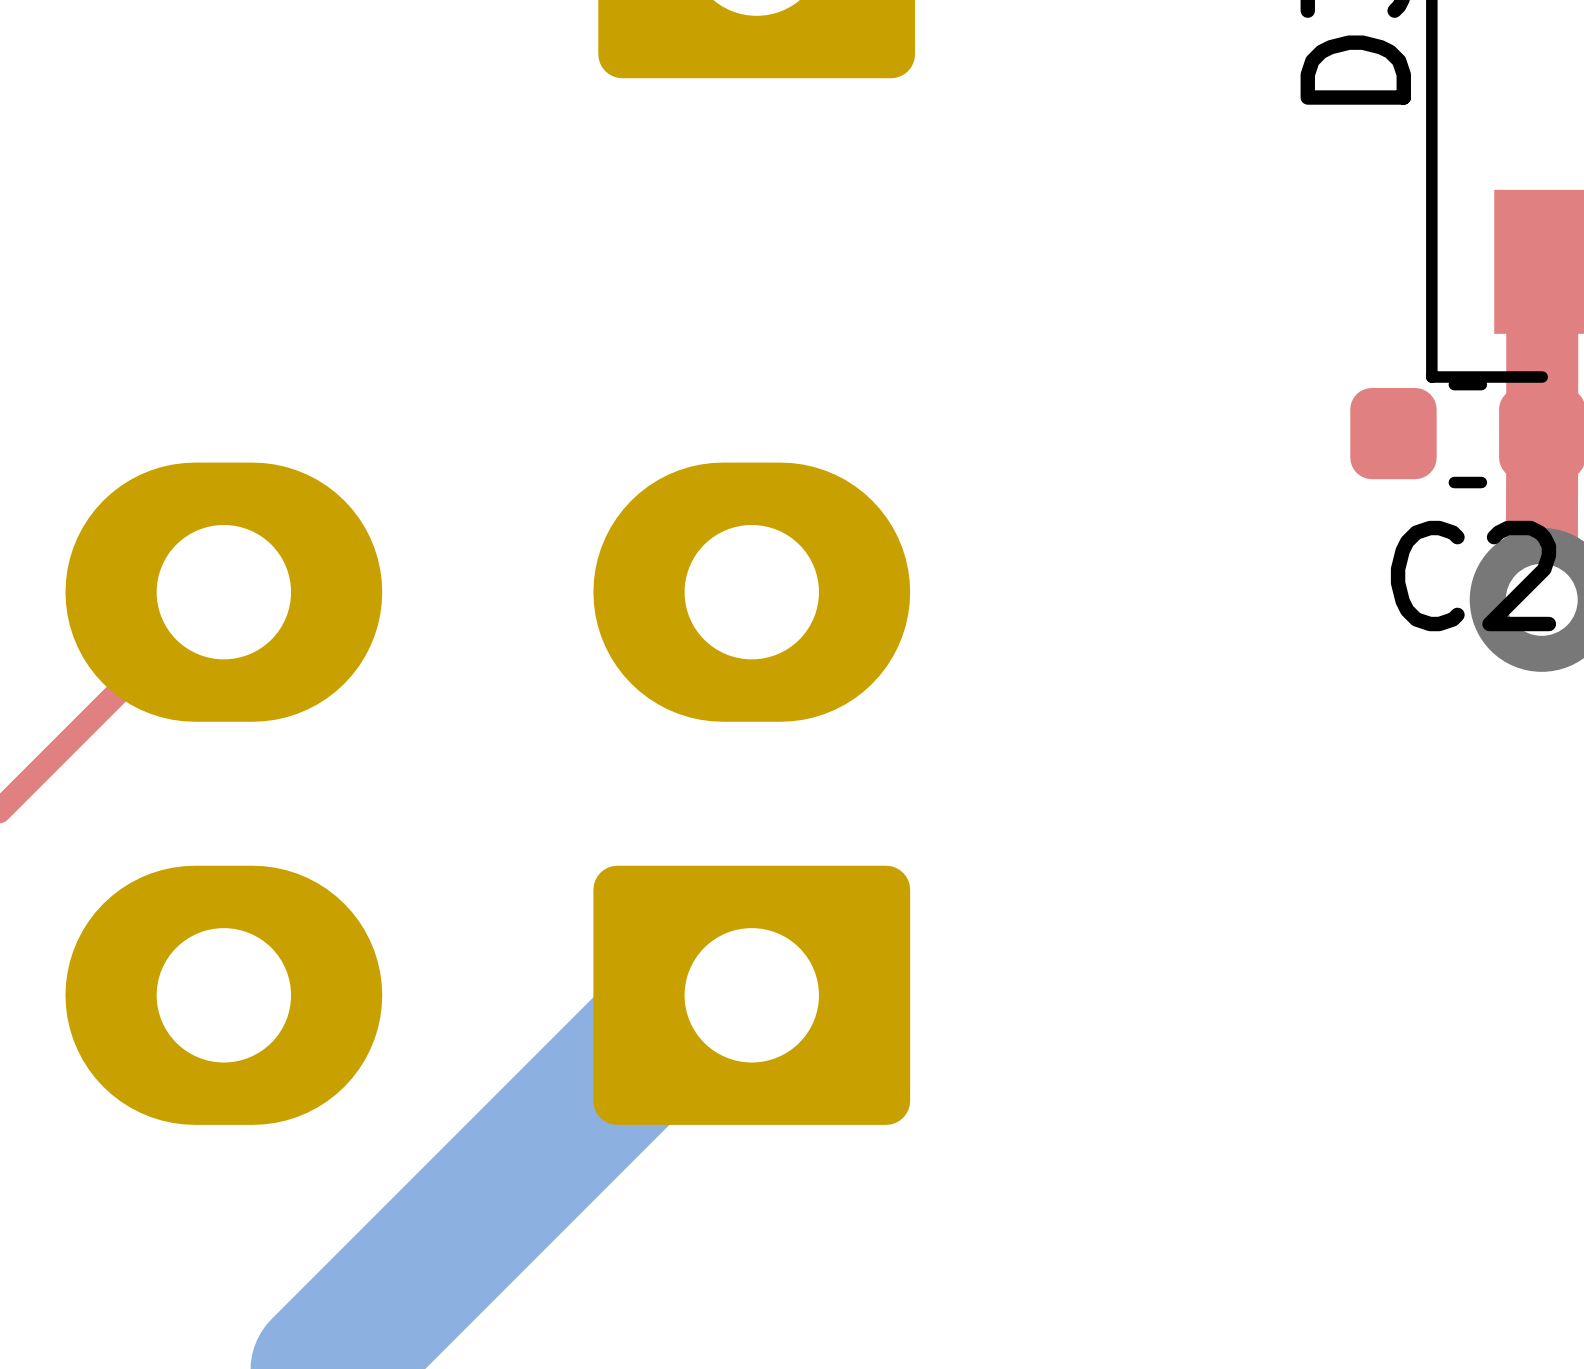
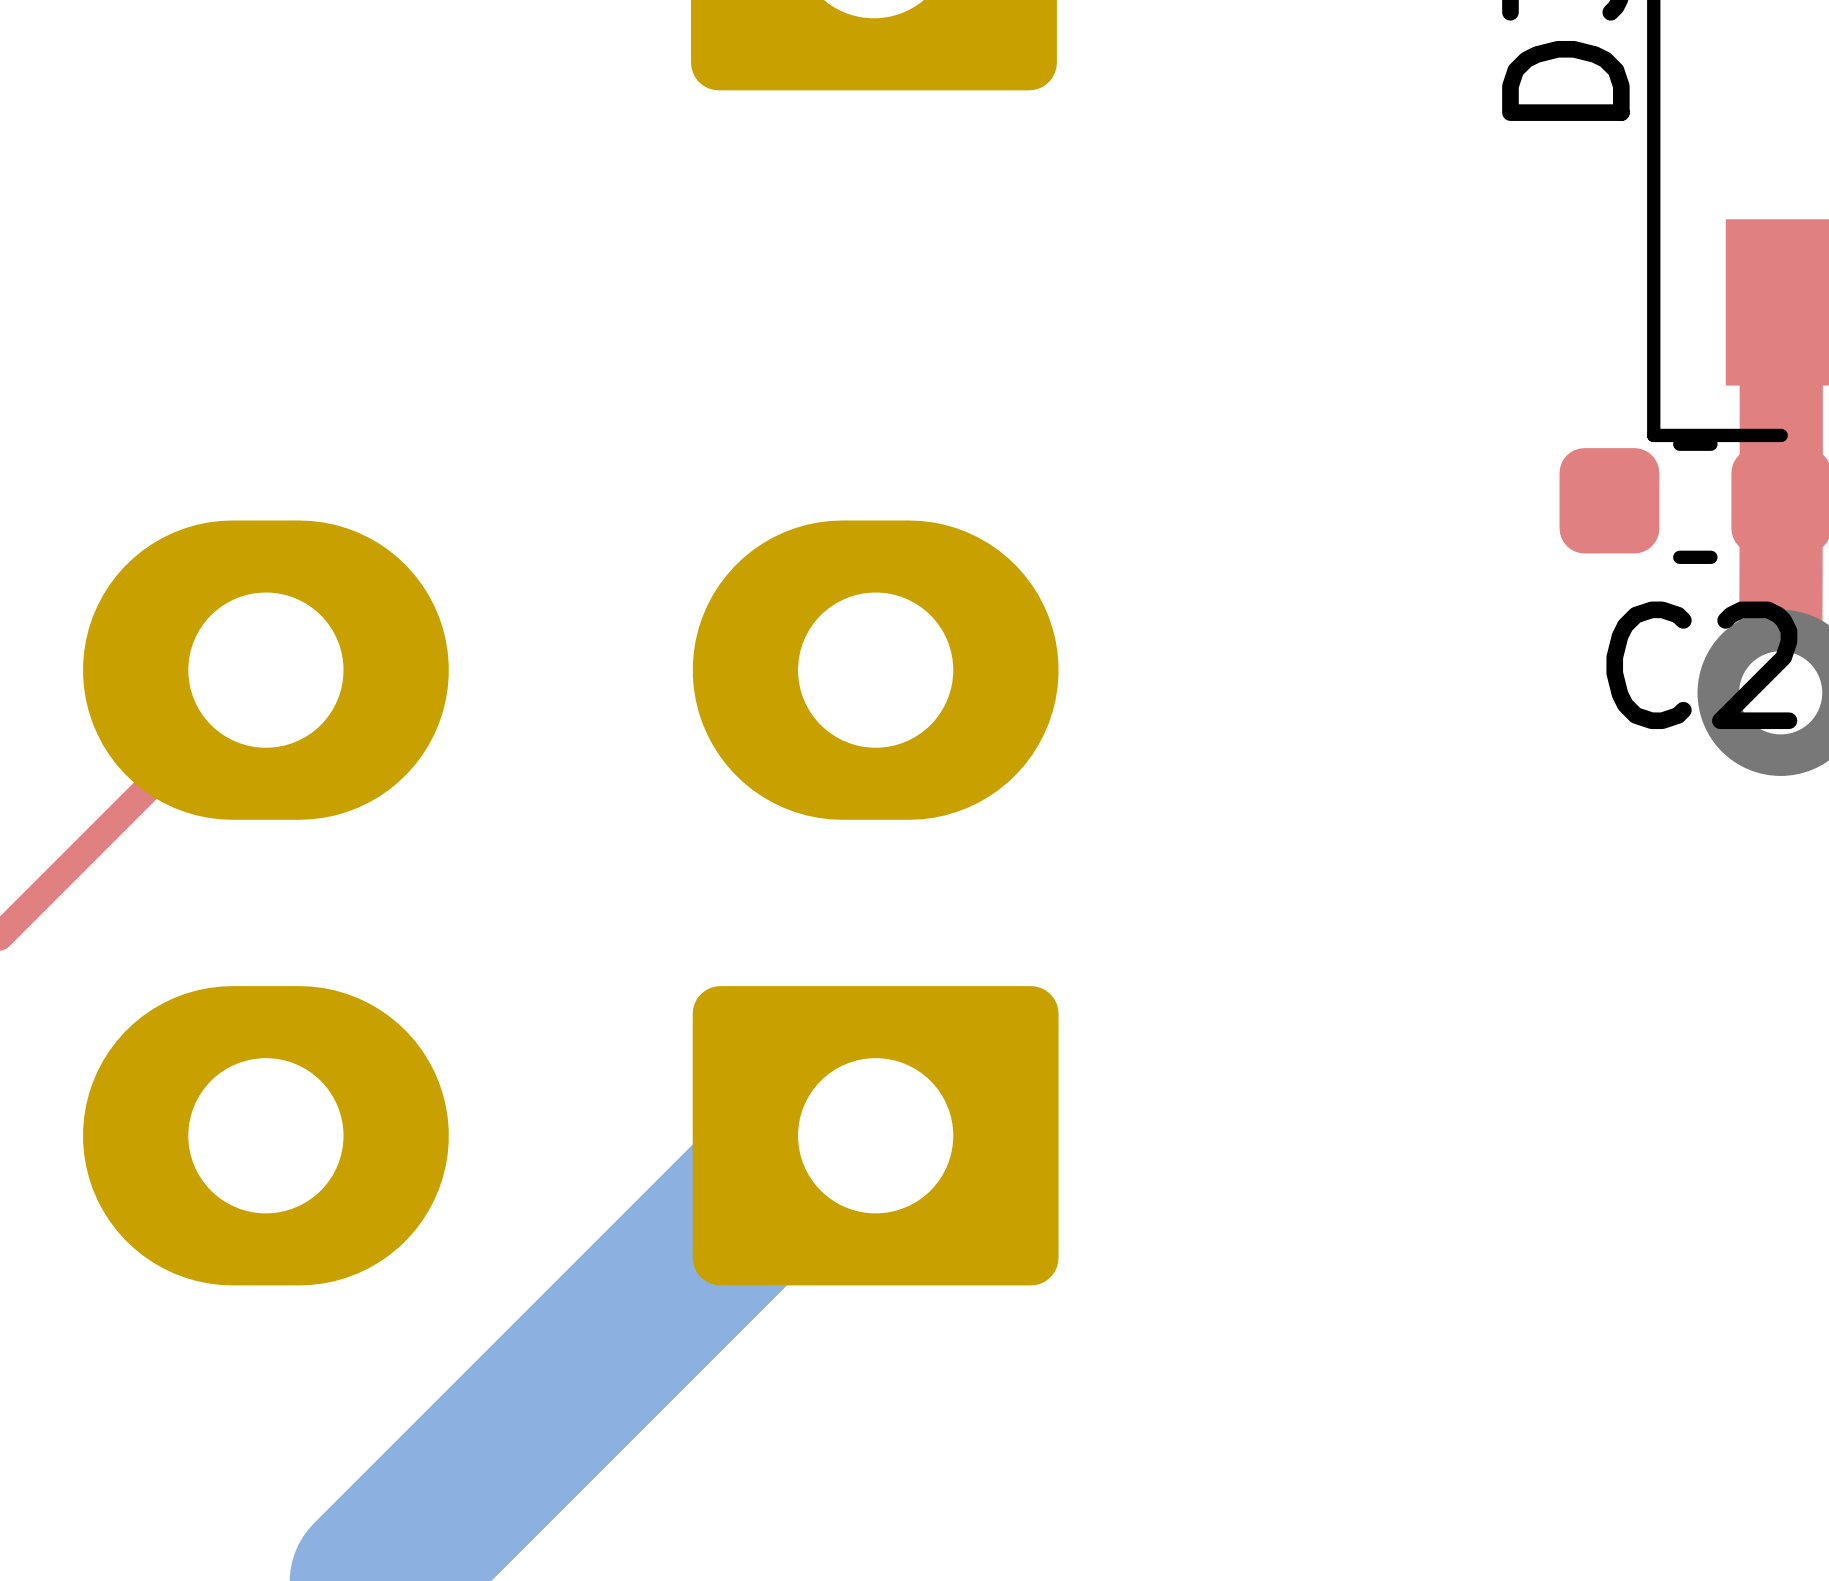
part position: (487, 793) -> (570, 902)

